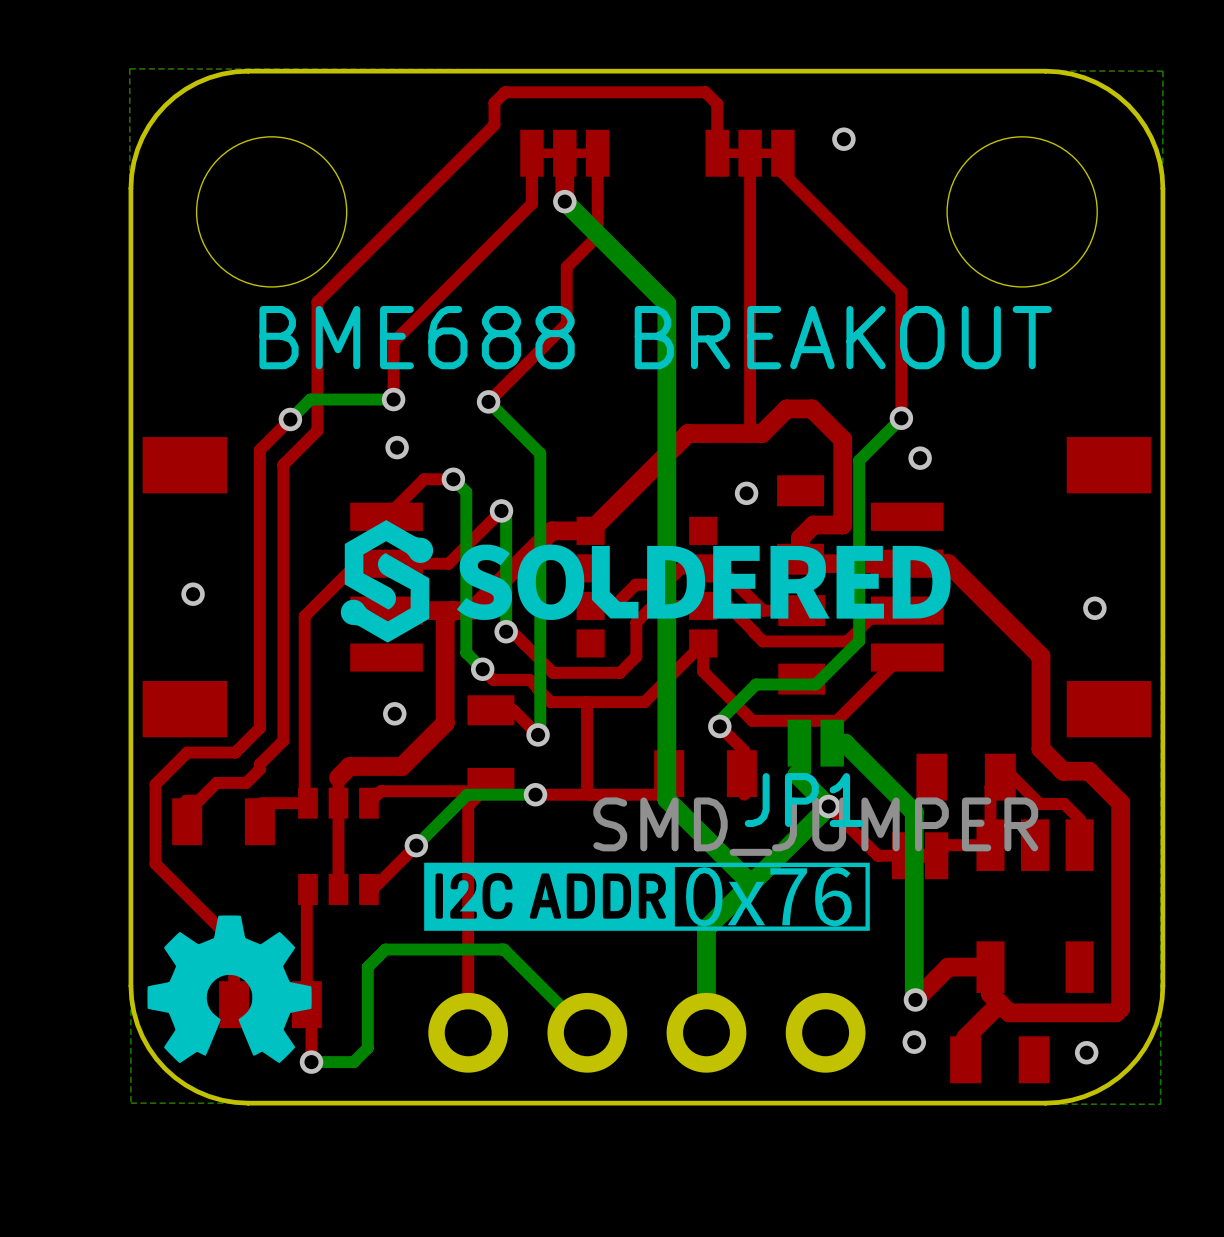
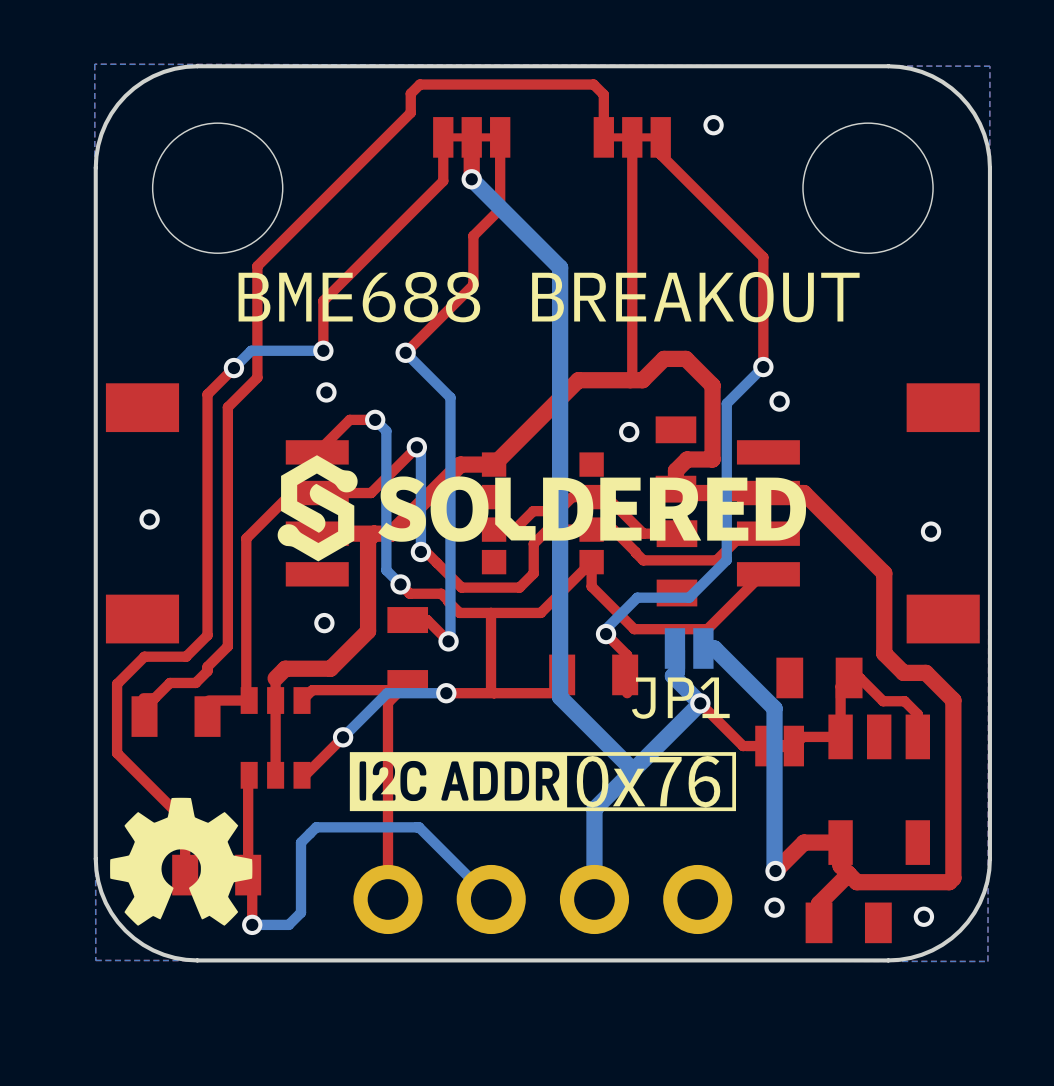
JP1 value: SMD_JUMPER (815, 826) -> none

